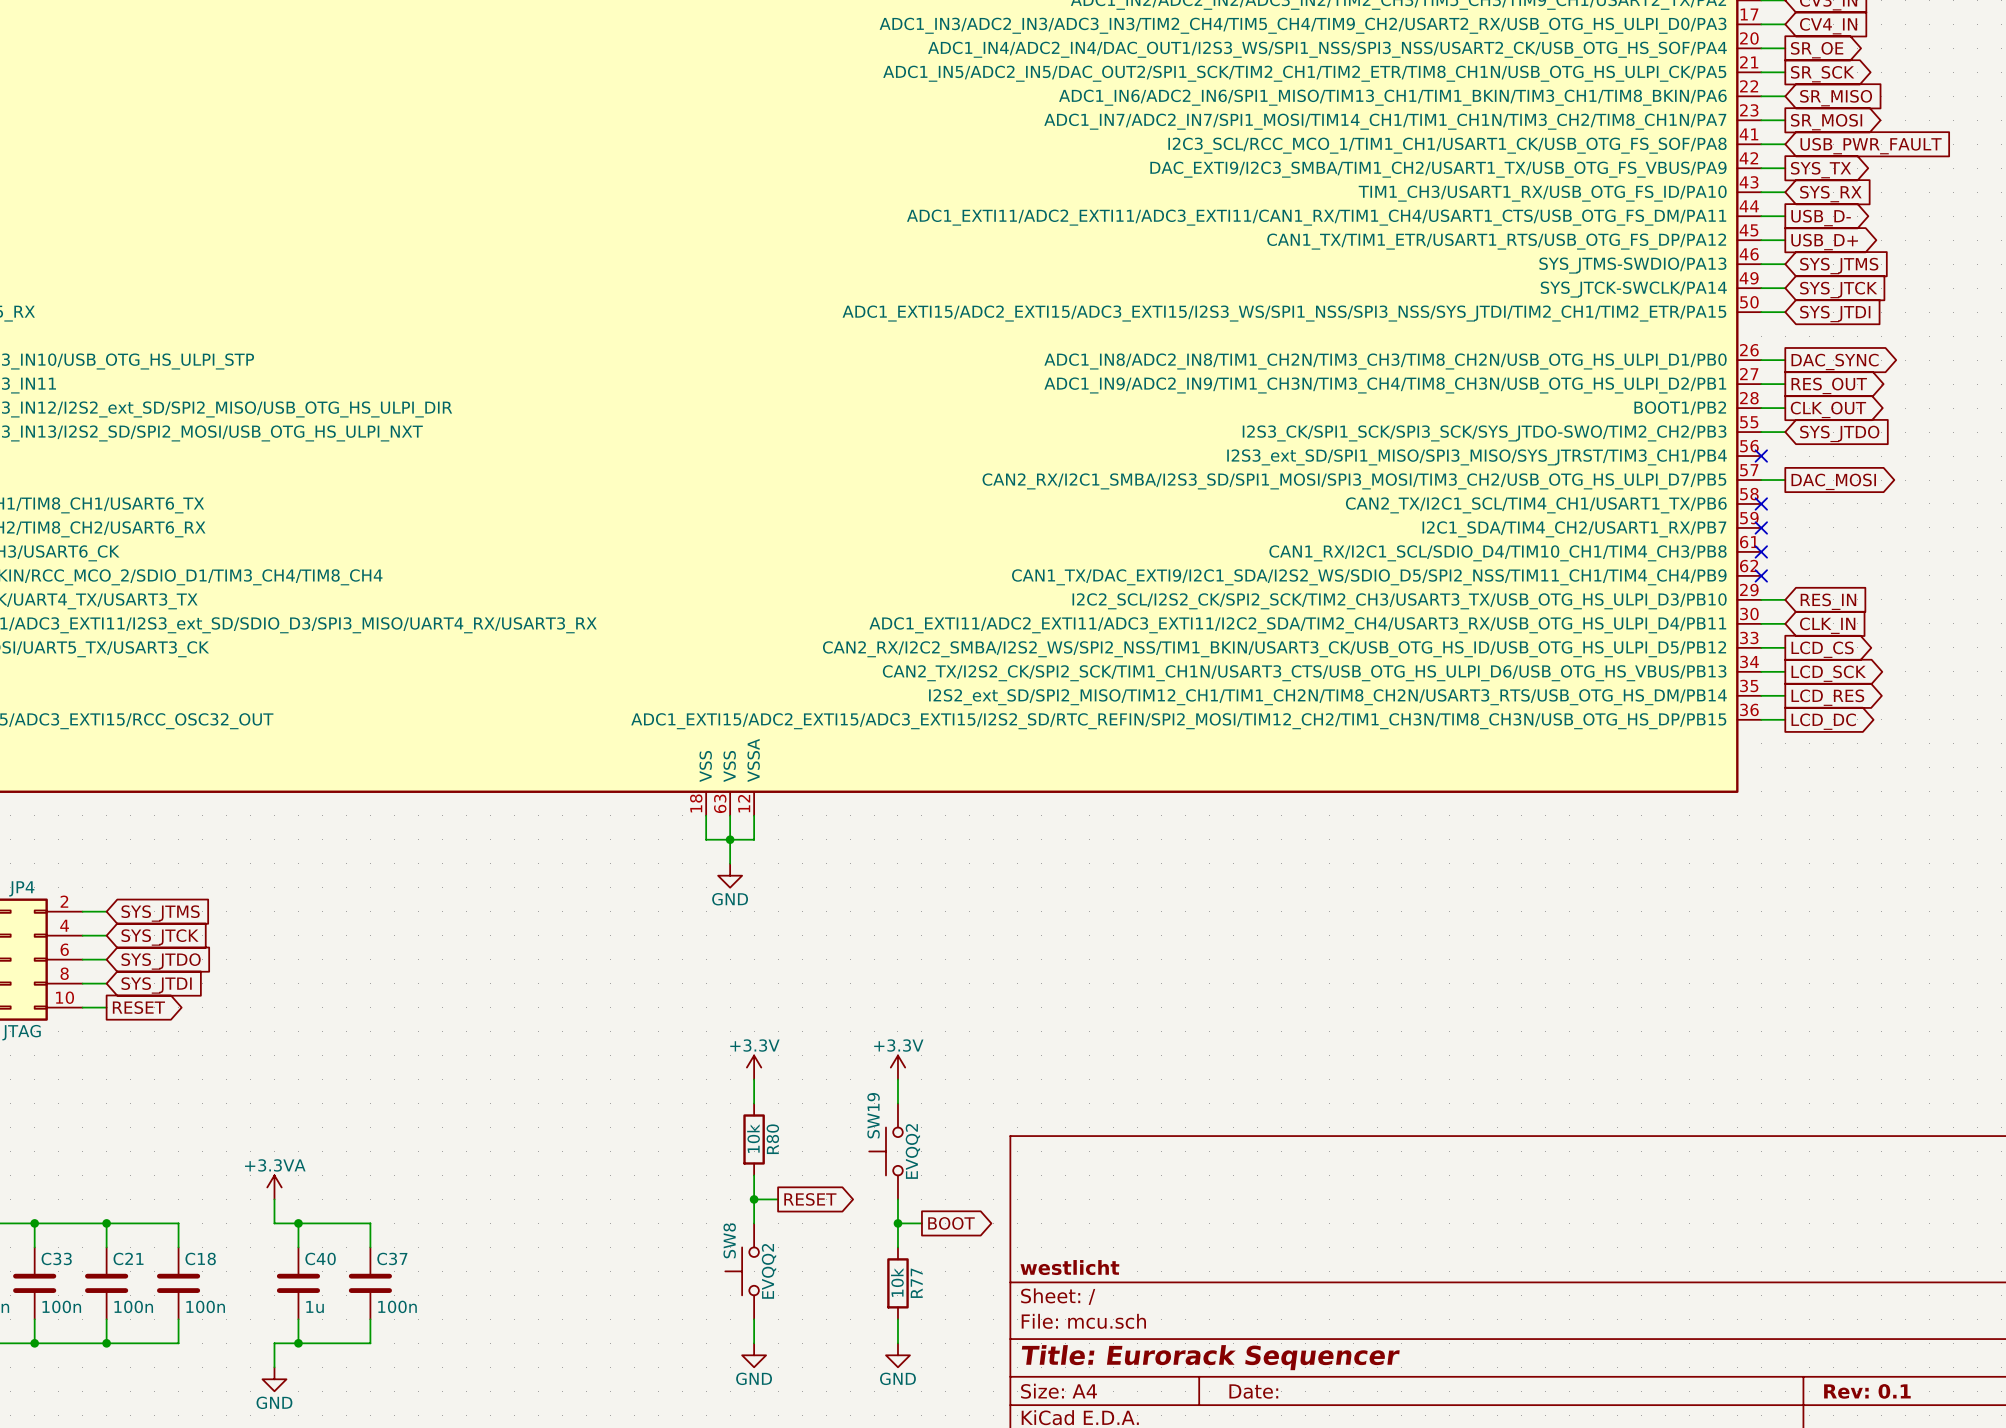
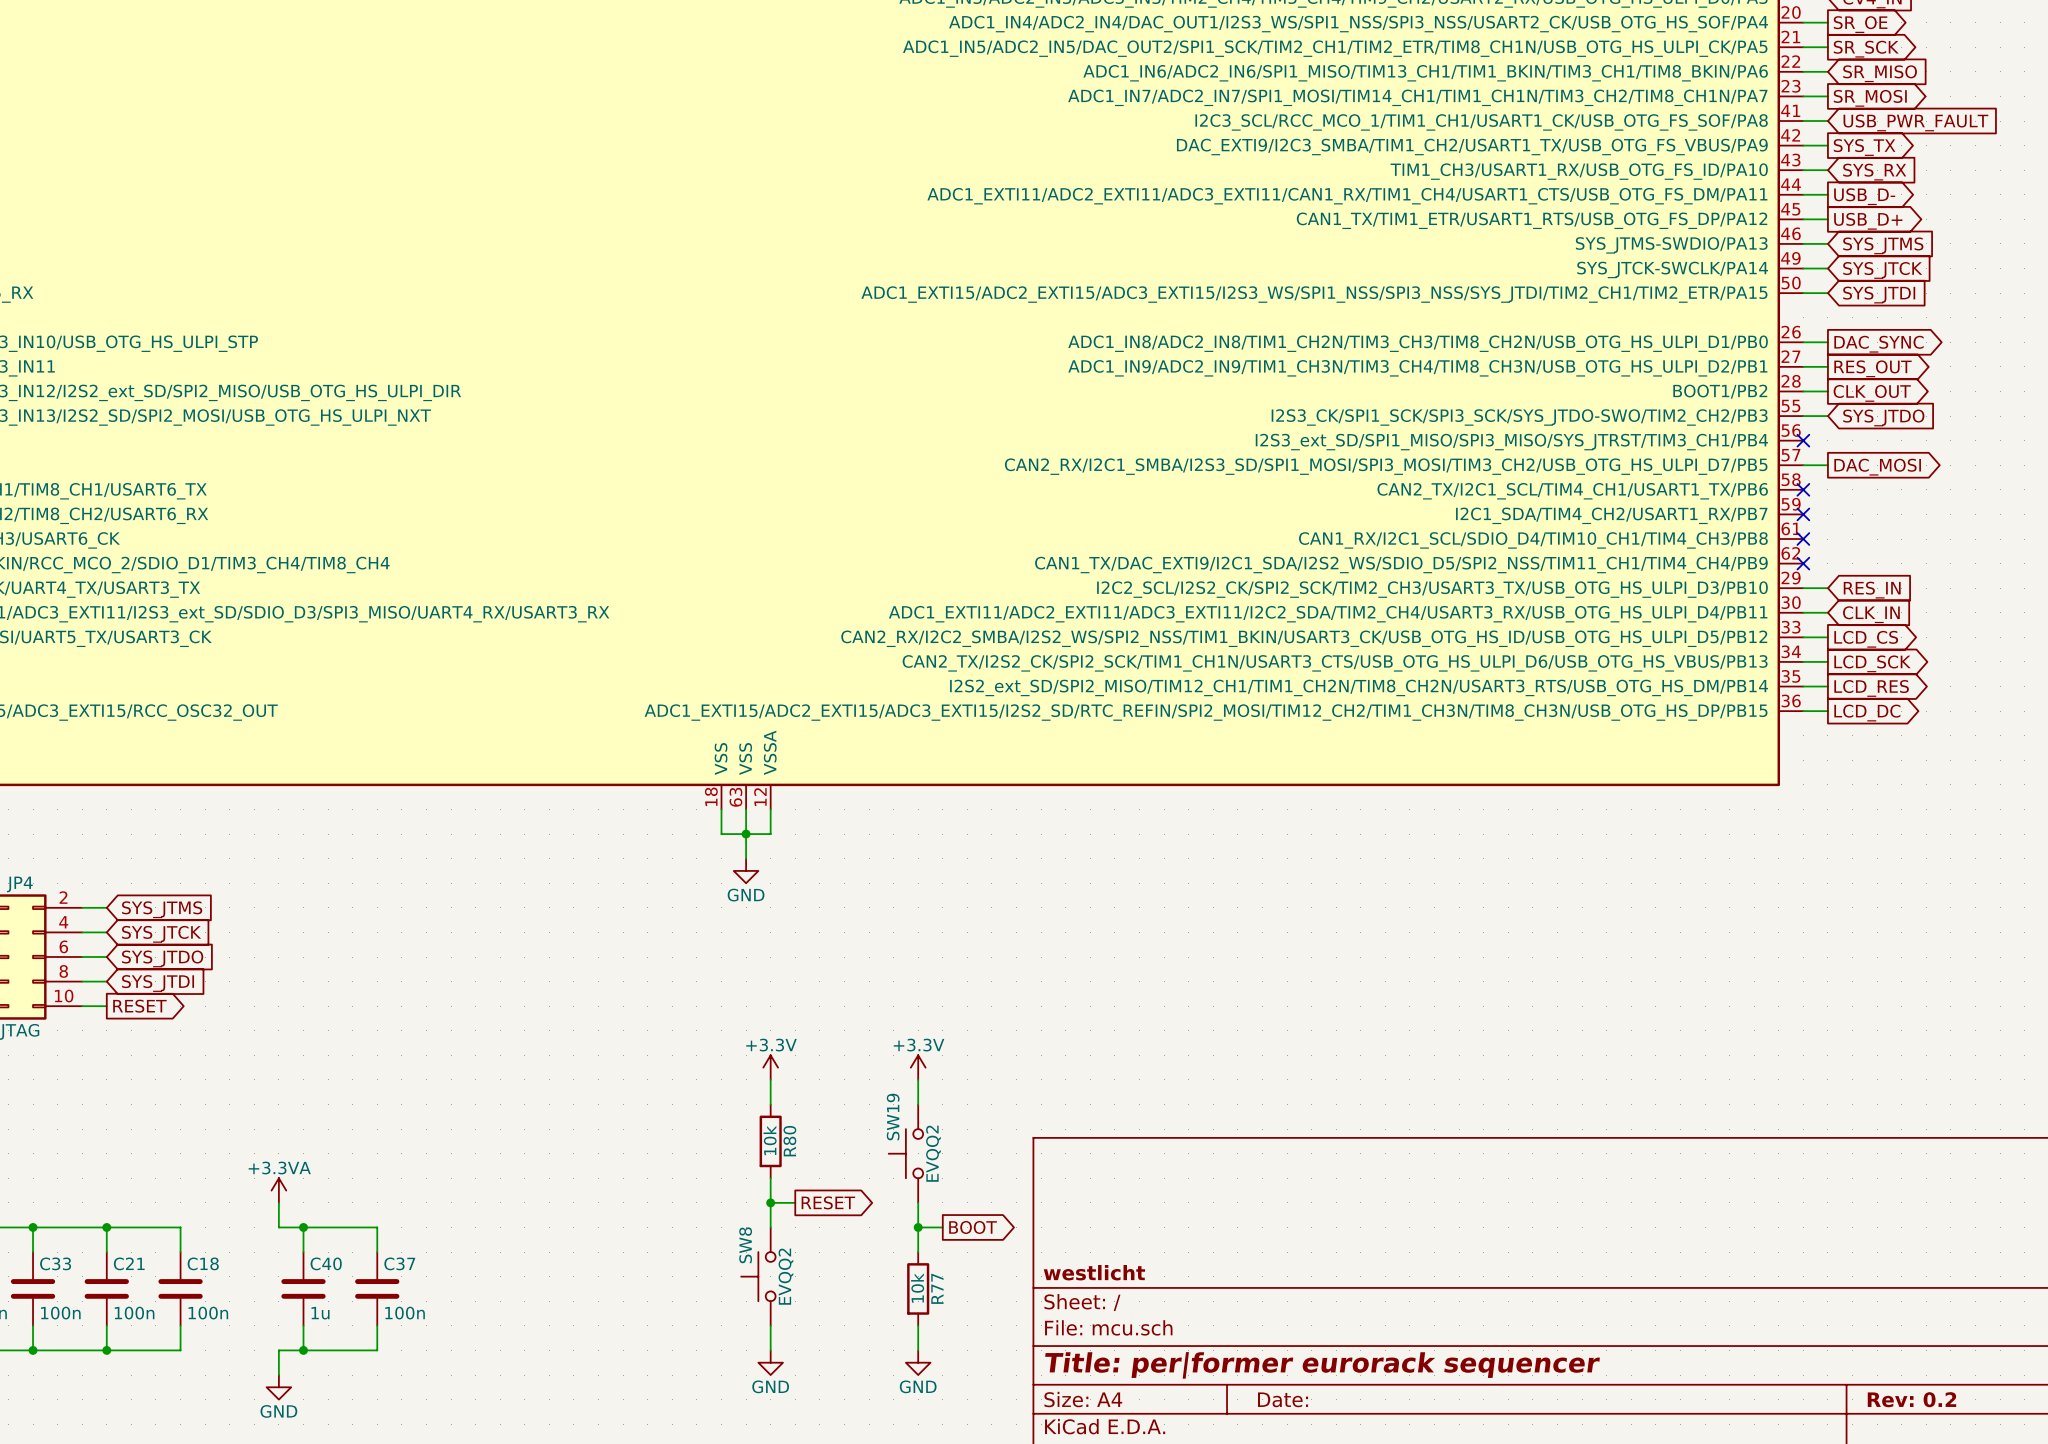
title block: Title: Eurorack Sequencer (1210, 1357) -> Title: per|former eurorack sequencer (1322, 1365)
title block: Rev: 0.1 (1867, 1391) -> Rev: 0.2 (1911, 1399)

